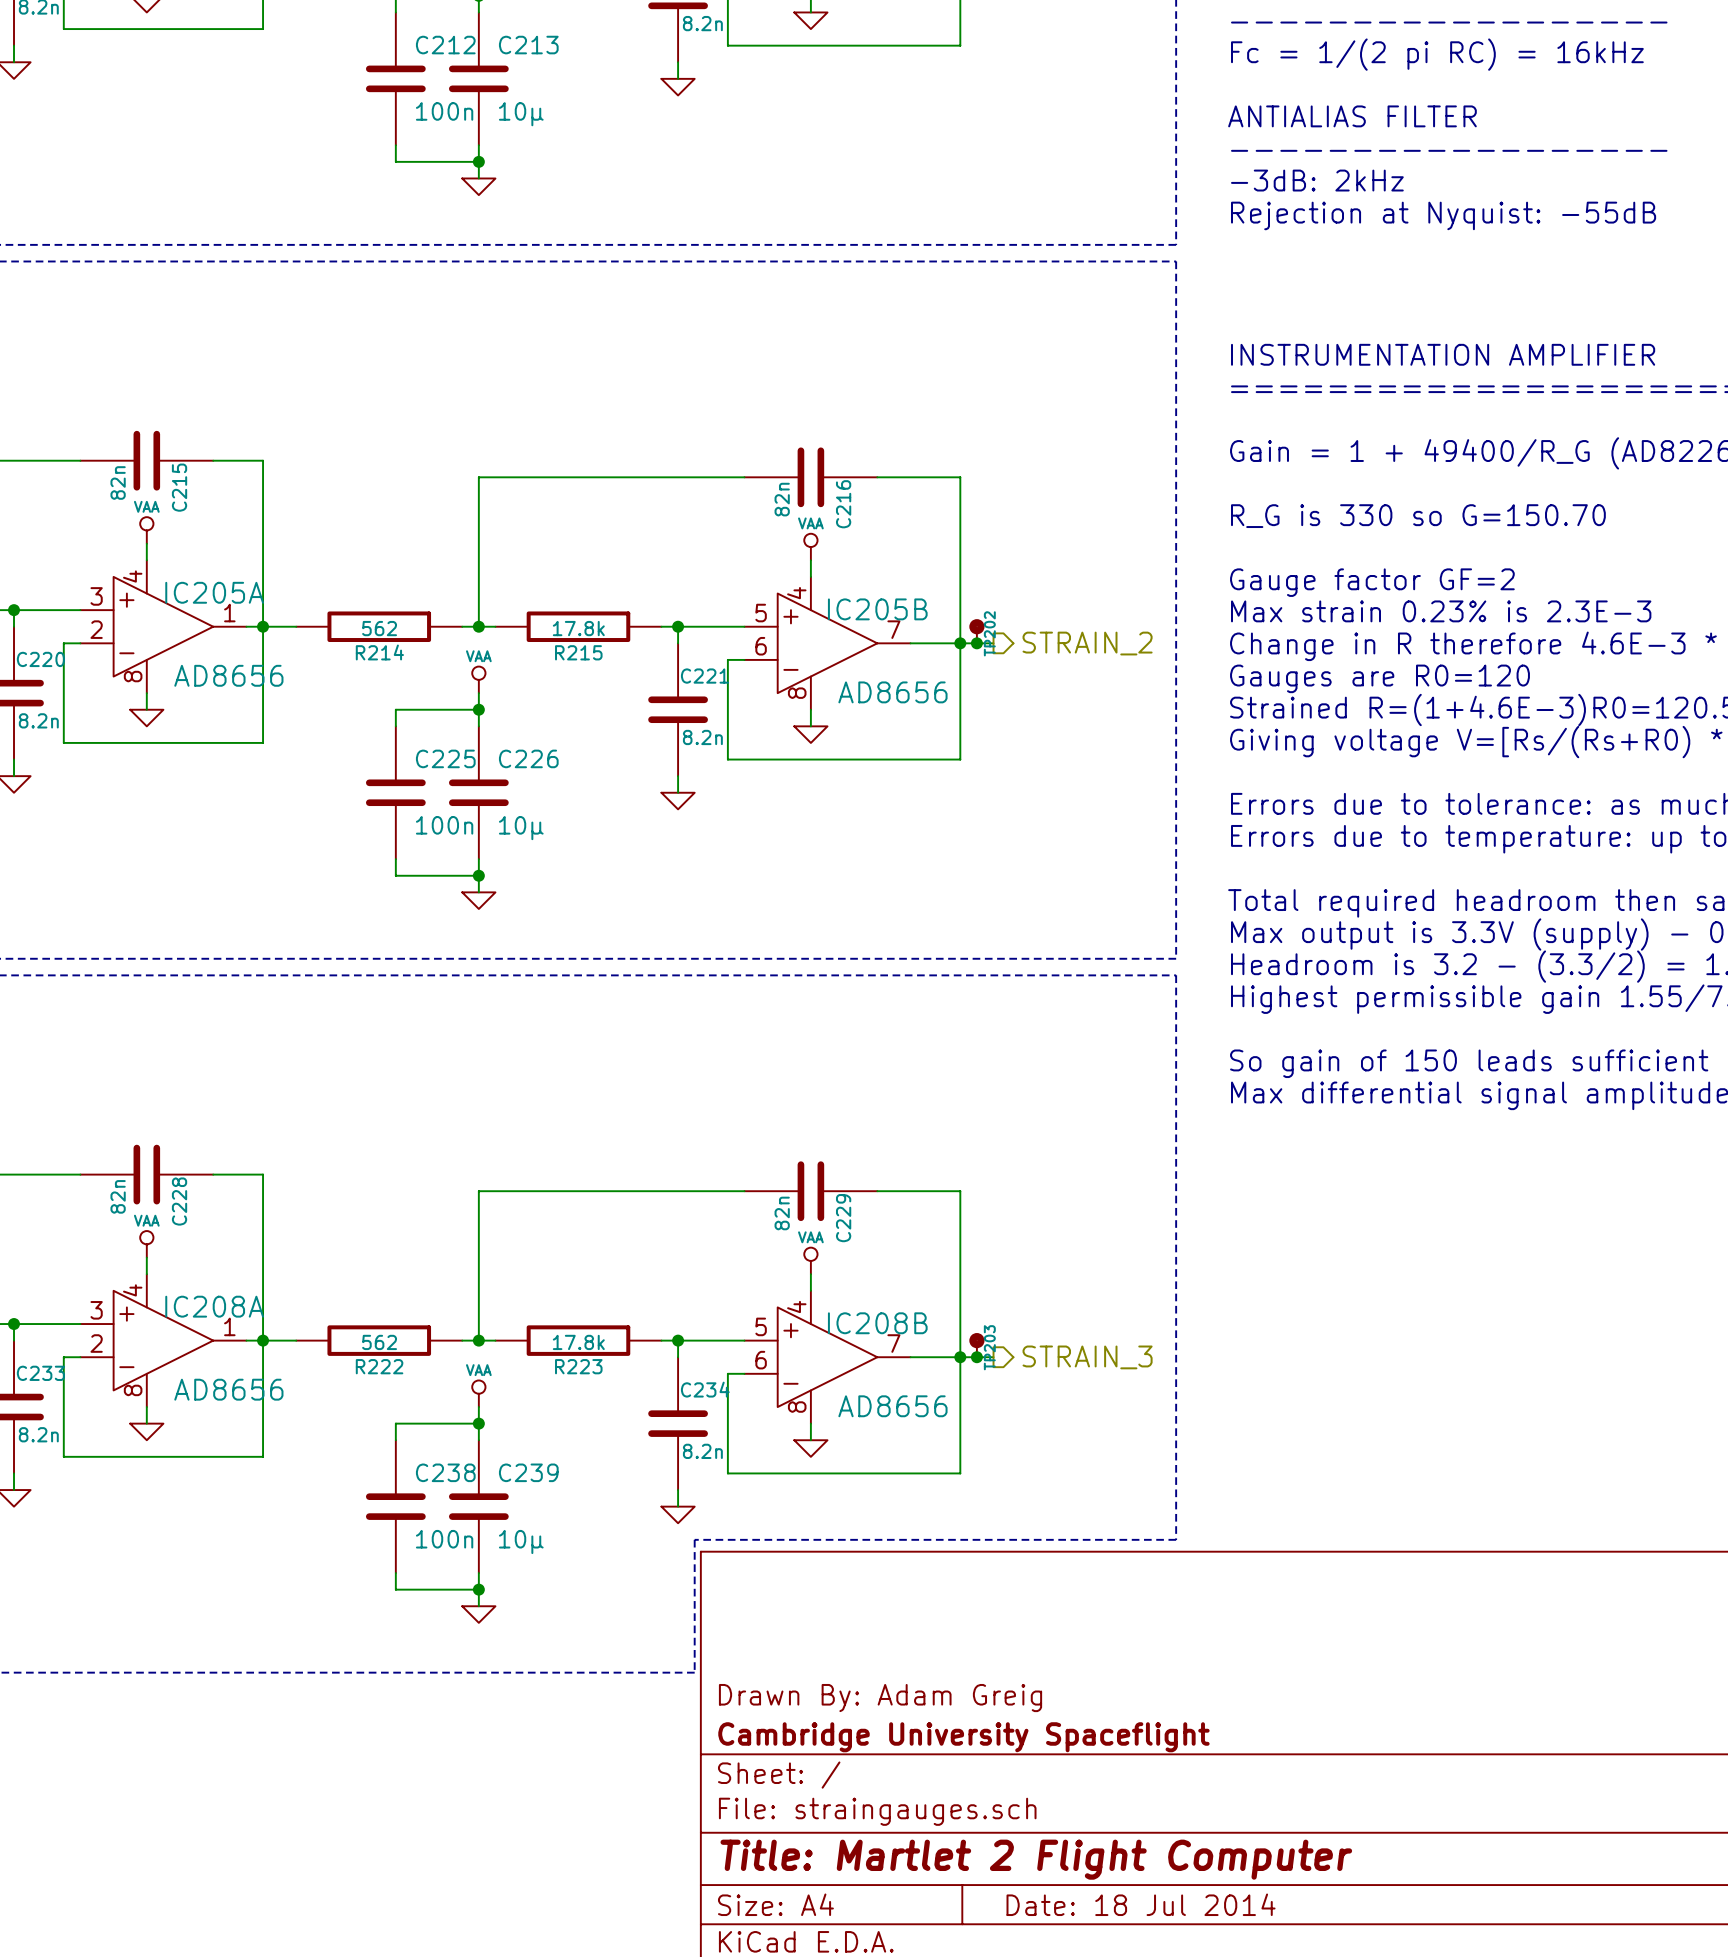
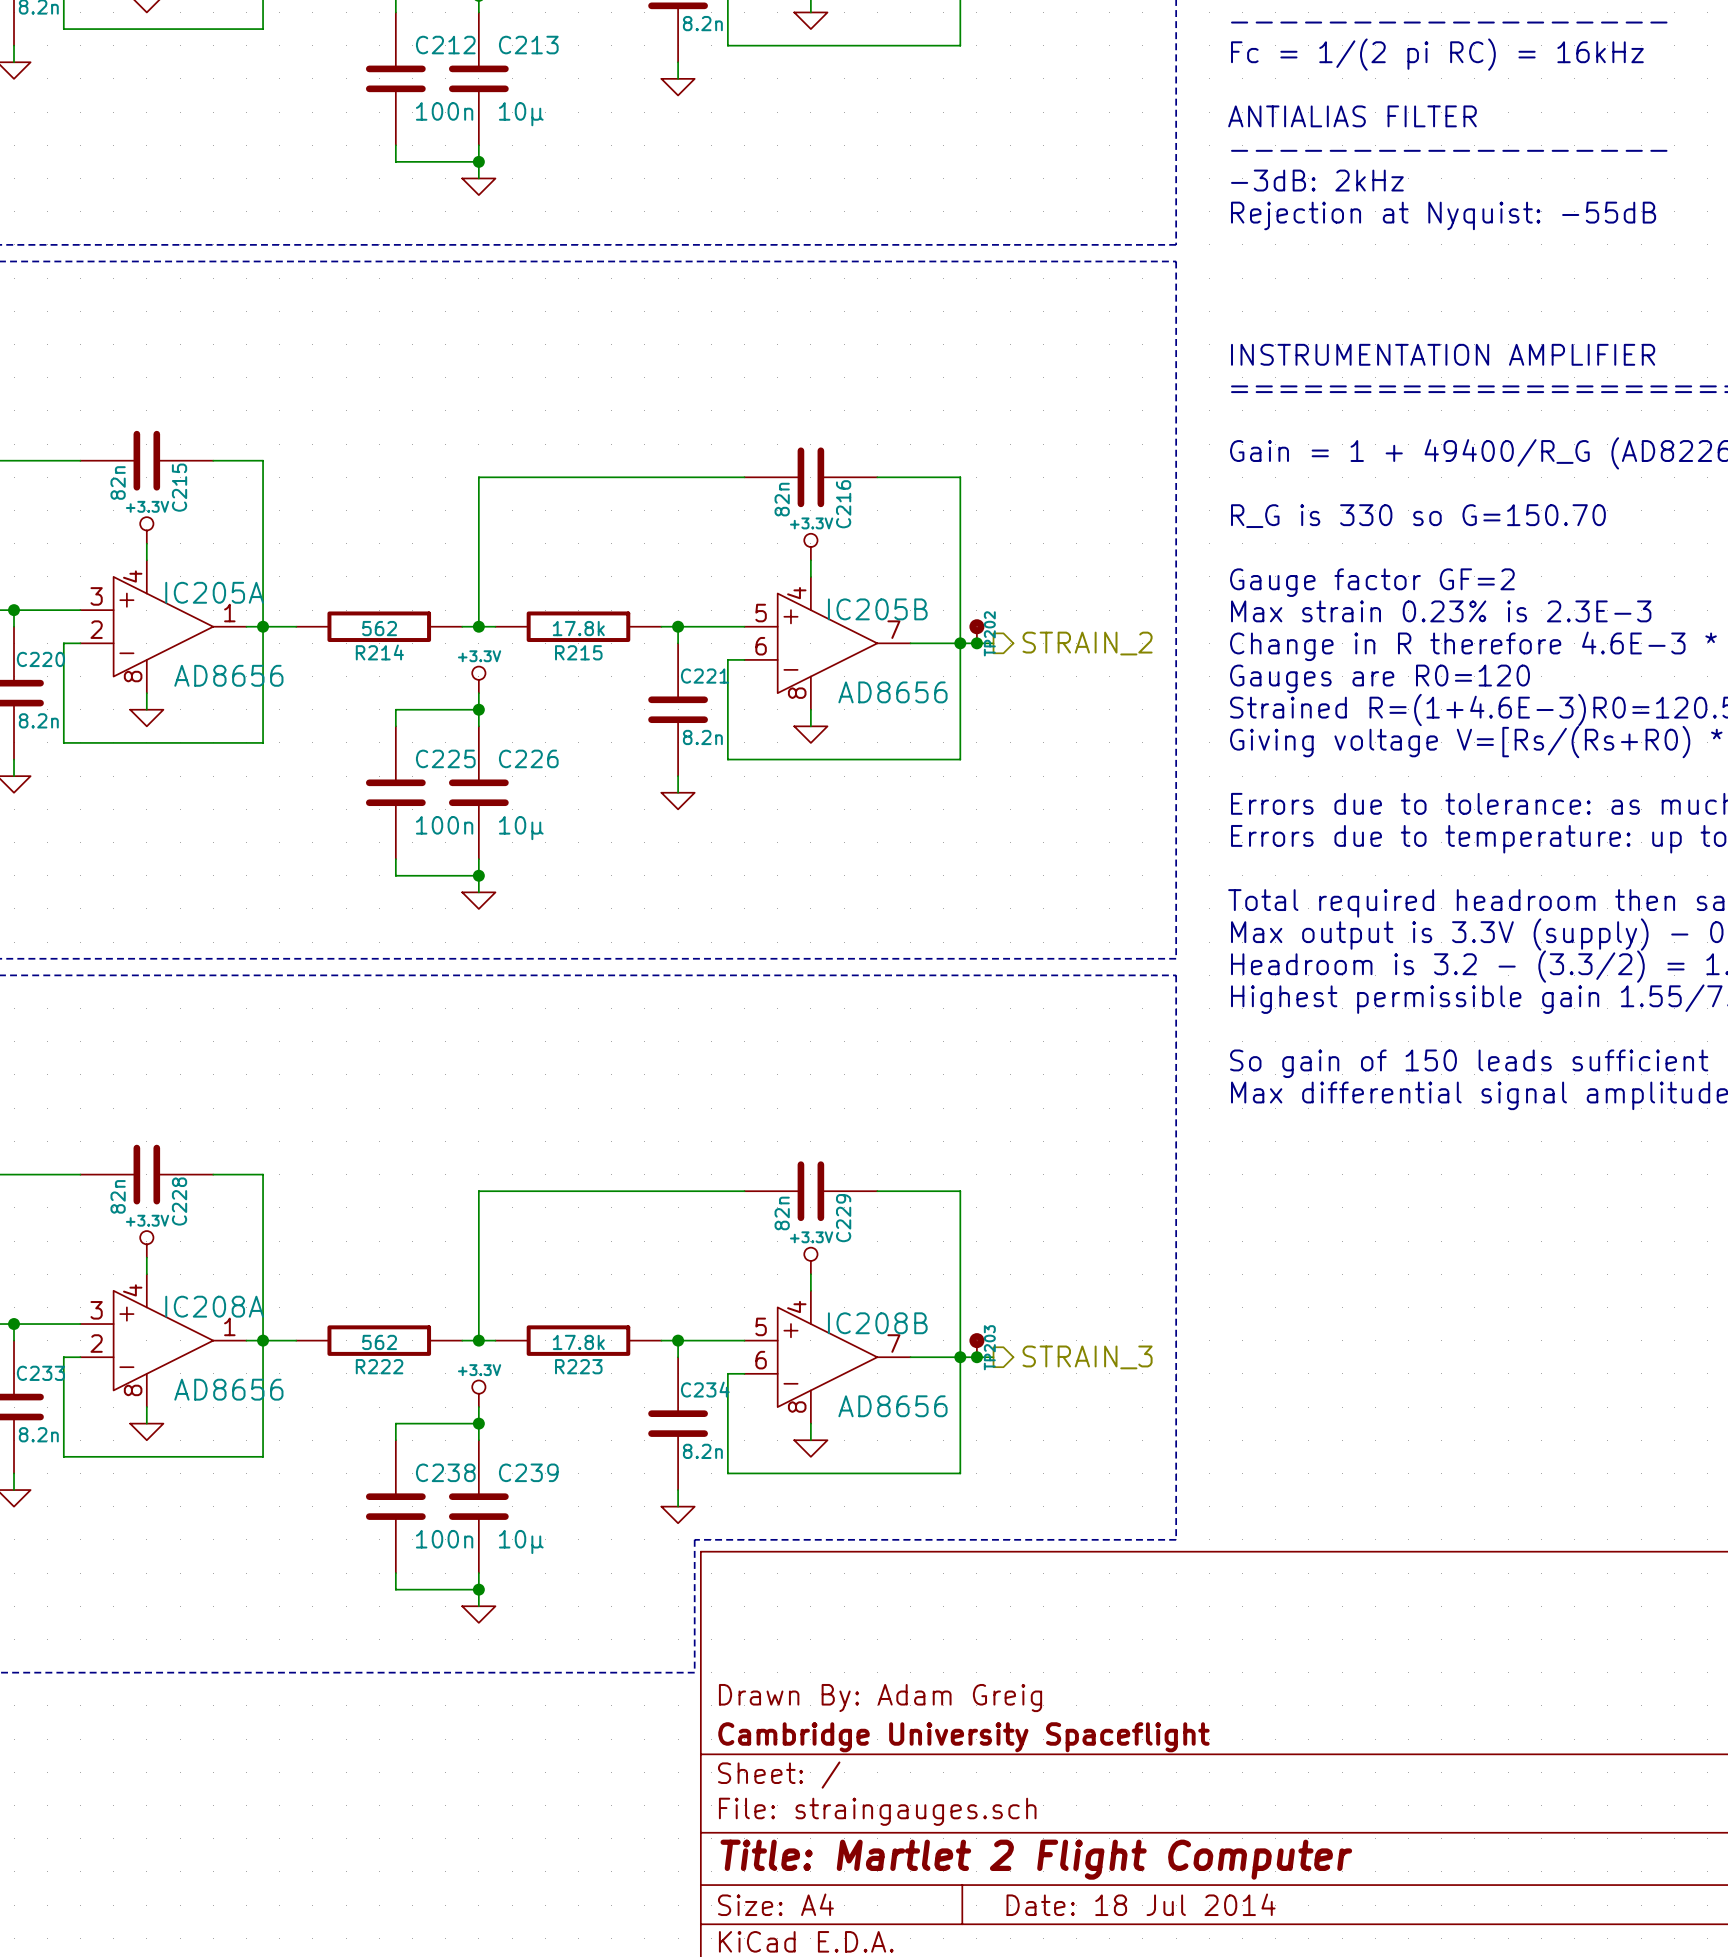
power symbol: VAA (146, 530) -> +3.3V (146, 530)
power symbol: VAA (810, 547) -> +3.3V (810, 547)
power symbol: VAA (478, 679) -> +3.3V (478, 679)
power symbol: VAA (146, 1244) -> +3.3V (146, 1244)
power symbol: VAA (810, 1260) -> +3.3V (810, 1260)
power symbol: VAA (478, 1393) -> +3.3V (478, 1393)

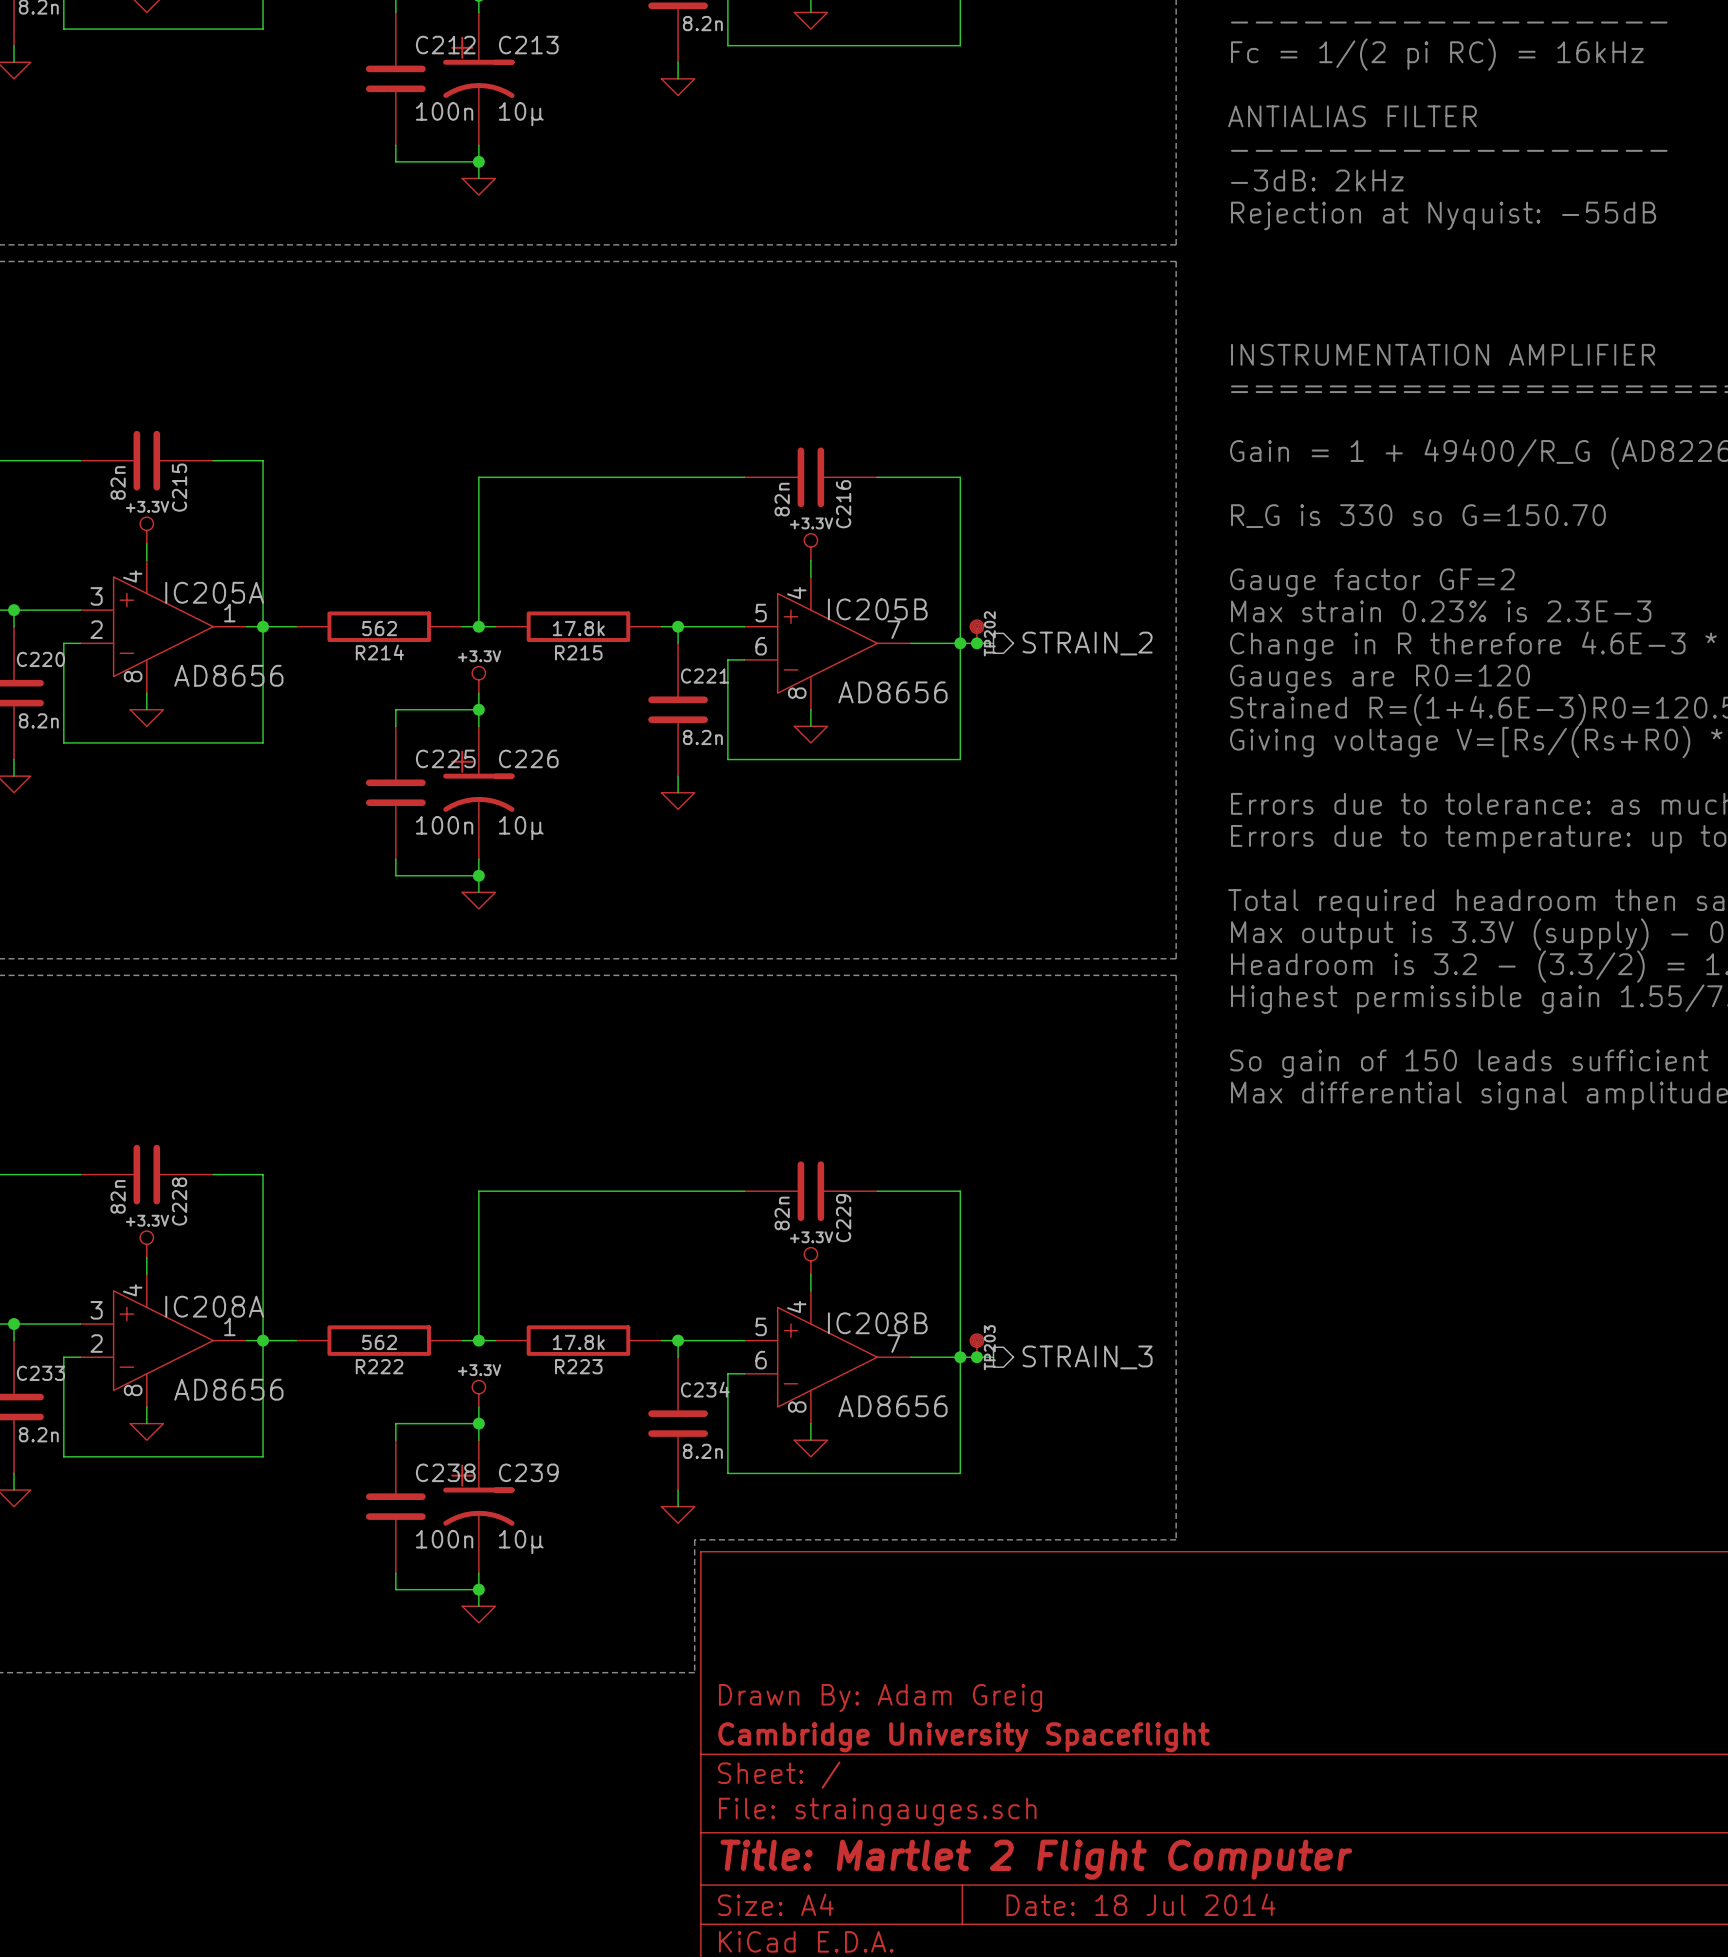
C213 symbol: [448, 12, 509, 146] -> [443, 12, 515, 146]
C226 symbol: [448, 726, 509, 860] -> [443, 726, 515, 860]
C239 symbol: [448, 1440, 509, 1574] -> [443, 1440, 515, 1574]

